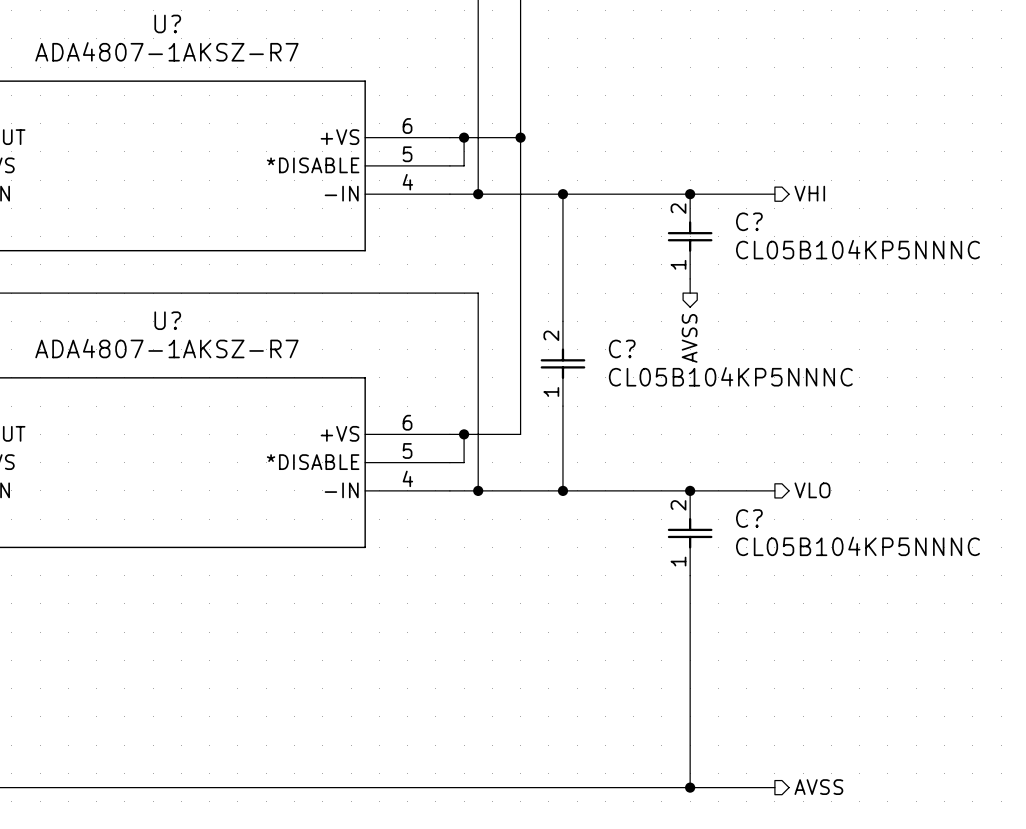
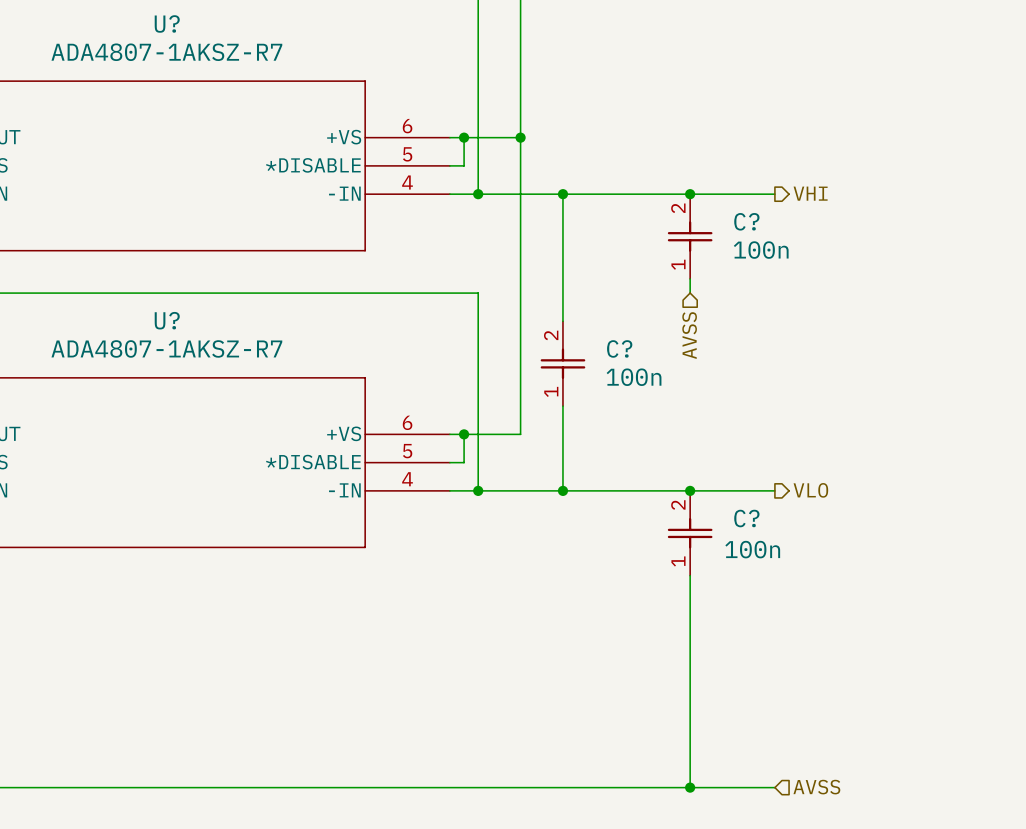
C? value: CL05B104KP5NNNC (857, 249) -> 100n (761, 250)
hierarchical label shape: output (689, 338) -> input (689, 335)
C? value: CL05B104KP5NNNC (730, 376) -> 100n (634, 377)
C? value: CL05B104KP5NNNC (857, 546) -> 100n (752, 549)
hierarchical label shape: output (818, 787) -> input (816, 787)

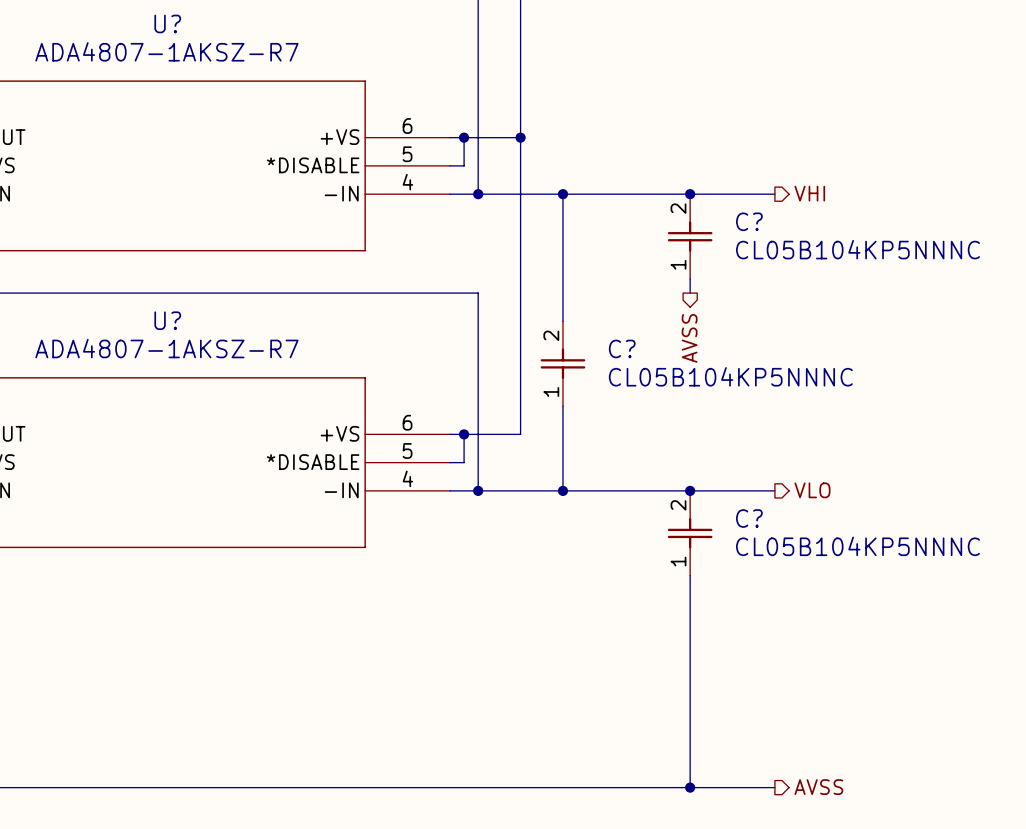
C? value: 100n (761, 250) -> CL05B104KP5NNNC (857, 249)
hierarchical label shape: input (689, 335) -> output (689, 338)
C? value: 100n (634, 377) -> CL05B104KP5NNNC (730, 376)
C? value: 100n (752, 549) -> CL05B104KP5NNNC (857, 546)
hierarchical label shape: input (816, 787) -> output (818, 787)

